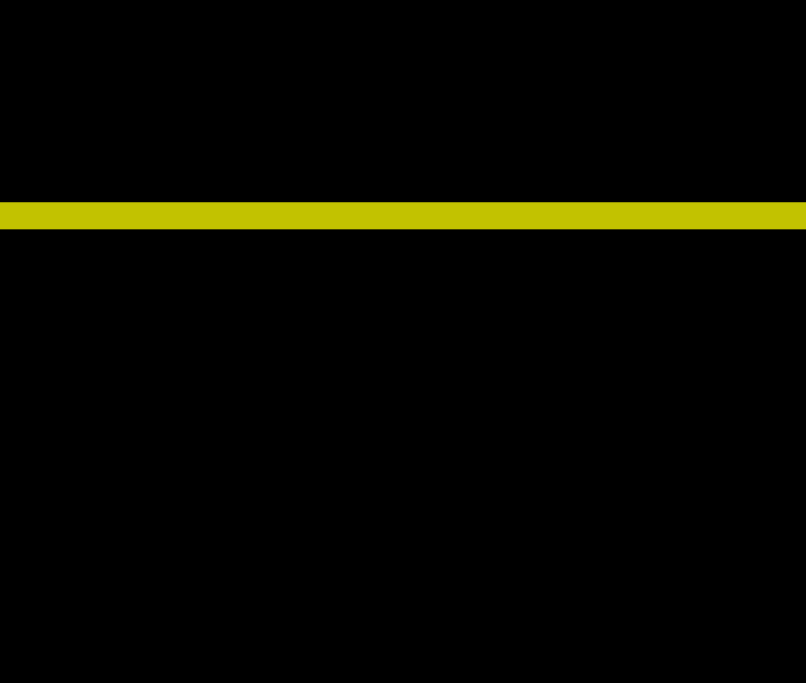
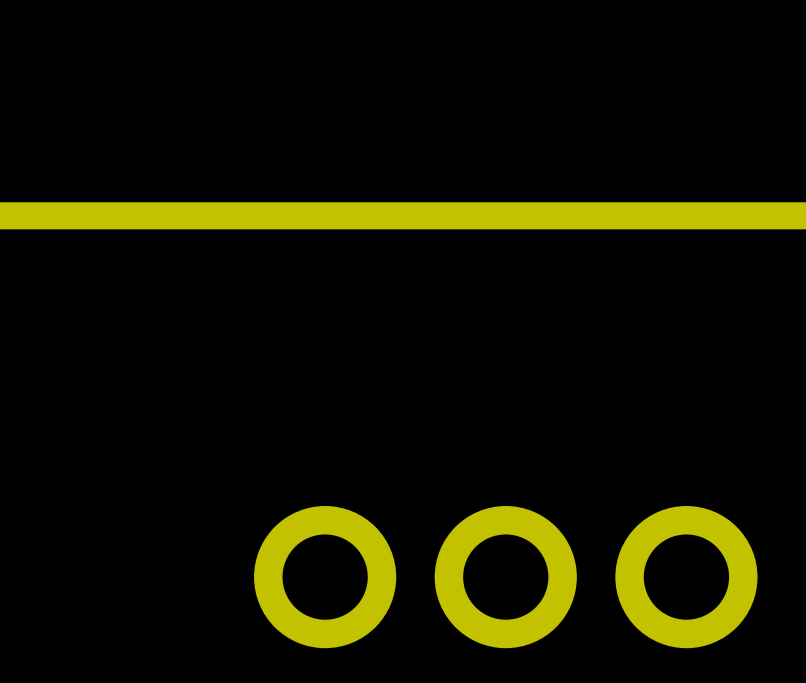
part: none -> (505, 577)

